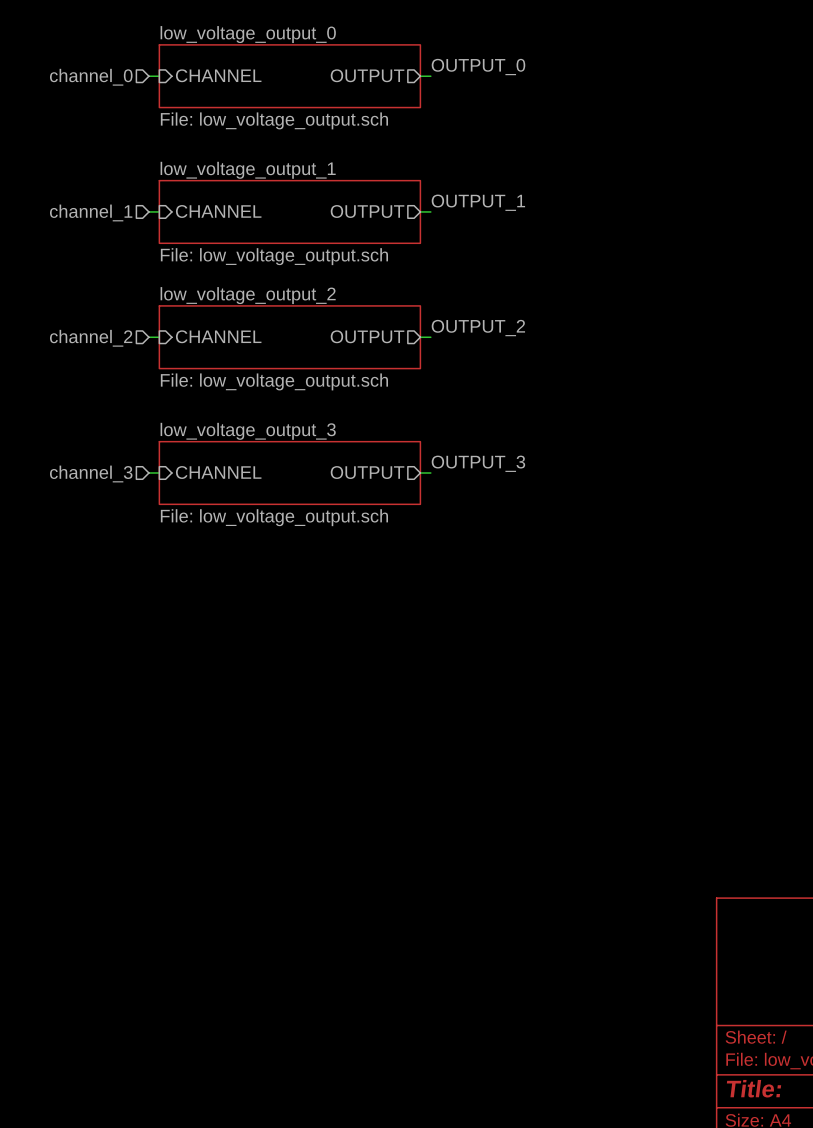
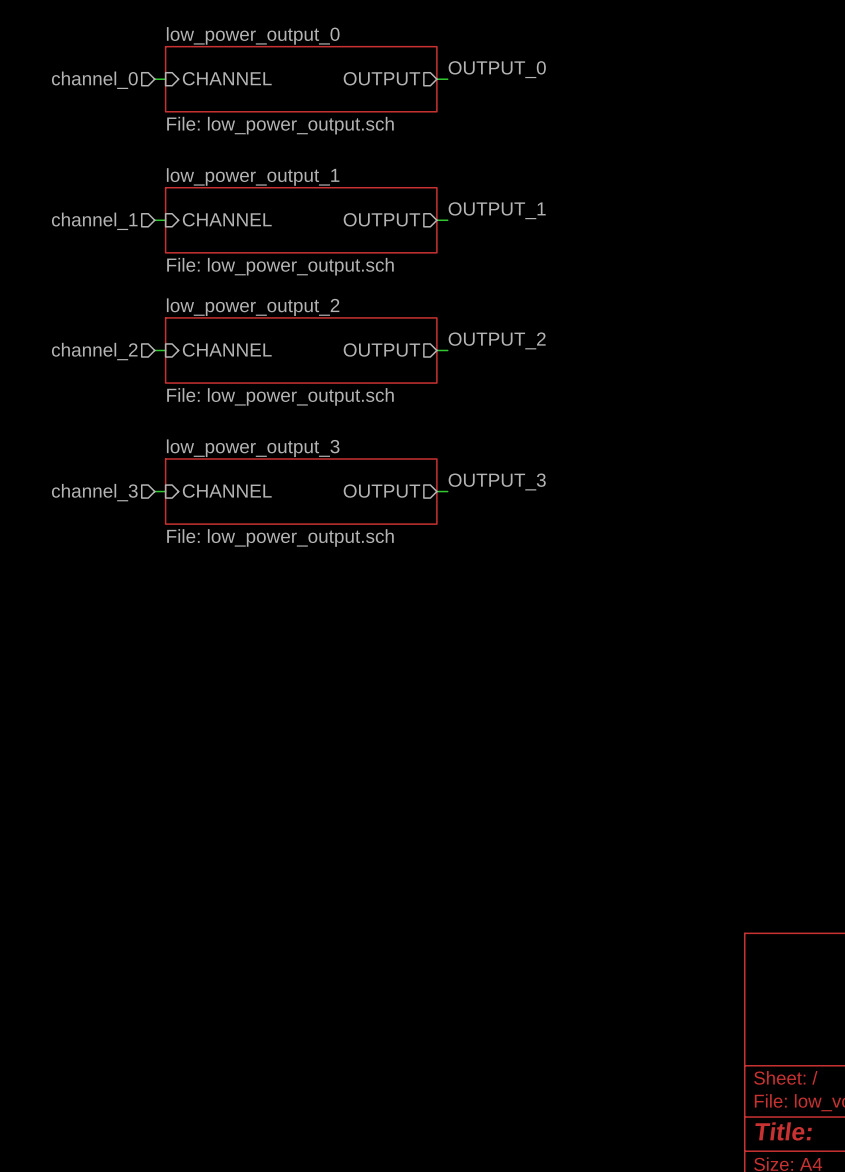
sheet low_voltage_output_0 name: low_voltage_output_0 (248, 34) -> low_power_output_0 (253, 35)
sheet low_voltage_output_0 value: File: low_voltage_output.sch (274, 120) -> File: low_power_output.sch (280, 125)
sheet low_voltage_output_1 name: low_voltage_output_1 (248, 170) -> low_power_output_1 (253, 176)
sheet low_voltage_output_1 value: File: low_voltage_output.sch (274, 256) -> File: low_power_output.sch (280, 266)
sheet low_voltage_output_2 name: low_voltage_output_2 (248, 295) -> low_power_output_2 (253, 307)
sheet low_voltage_output_2 value: File: low_voltage_output.sch (274, 381) -> File: low_power_output.sch (280, 396)
sheet low_voltage_output_3 name: low_voltage_output_3 (248, 431) -> low_power_output_3 (253, 448)
sheet low_voltage_output_3 value: File: low_voltage_output.sch (274, 517) -> File: low_power_output.sch (280, 537)

